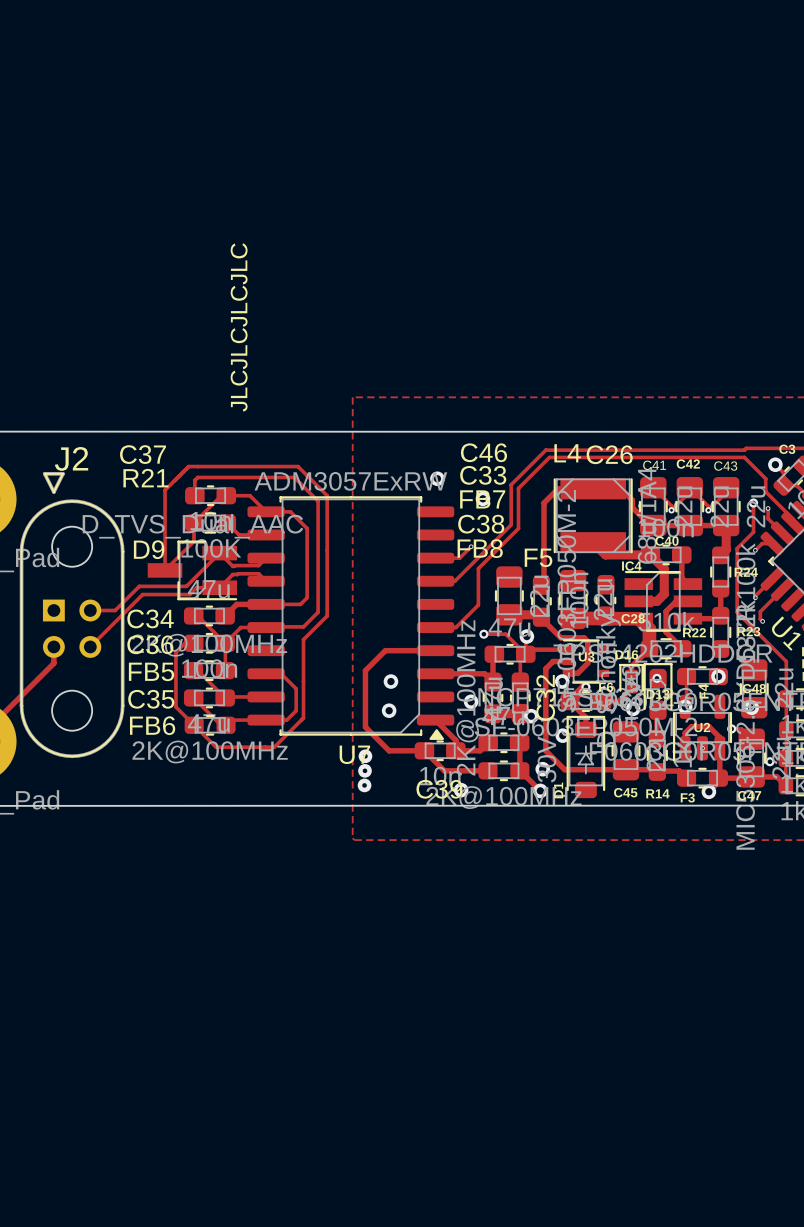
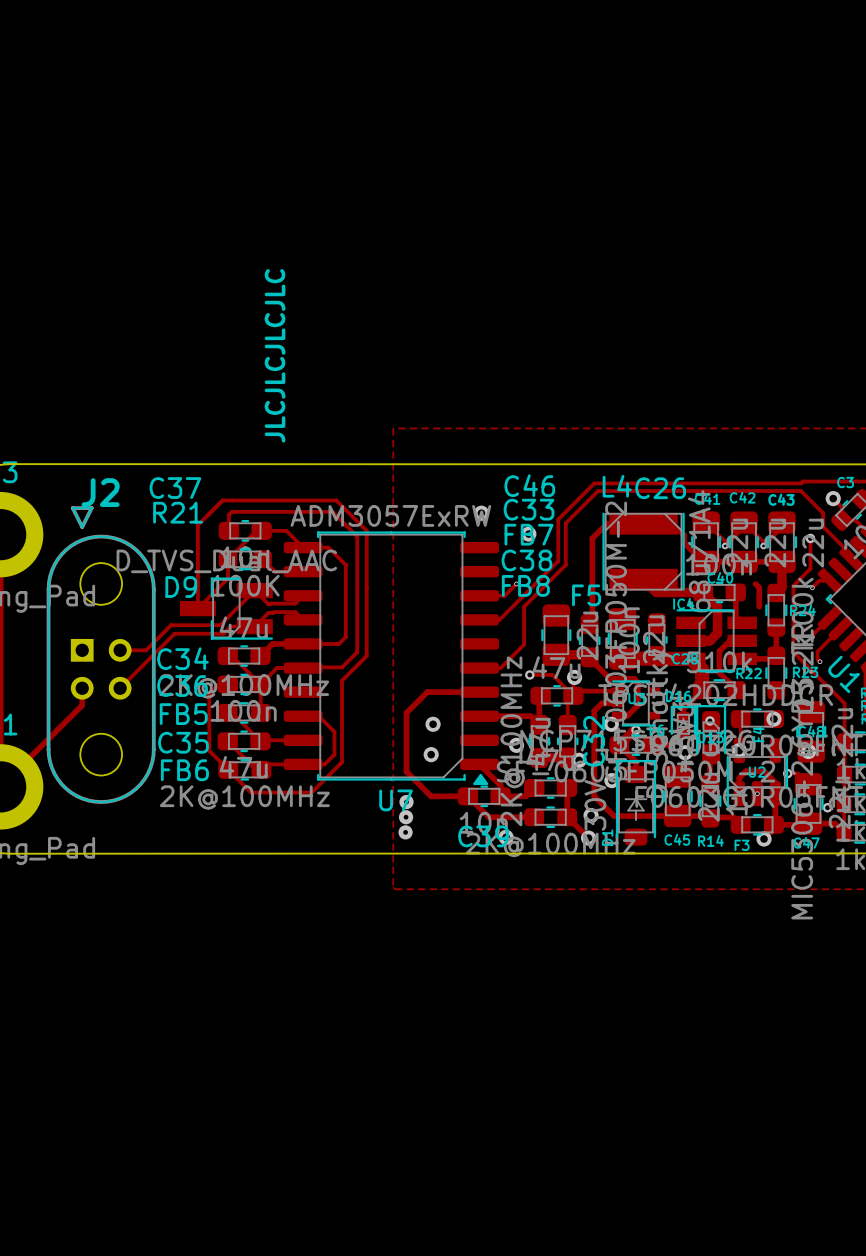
track: (768, 508) (768, 518) (782, 533) -> none
via: (768, 508) -> none
track: none -> (755, 583) (759, 587) (759, 606)

